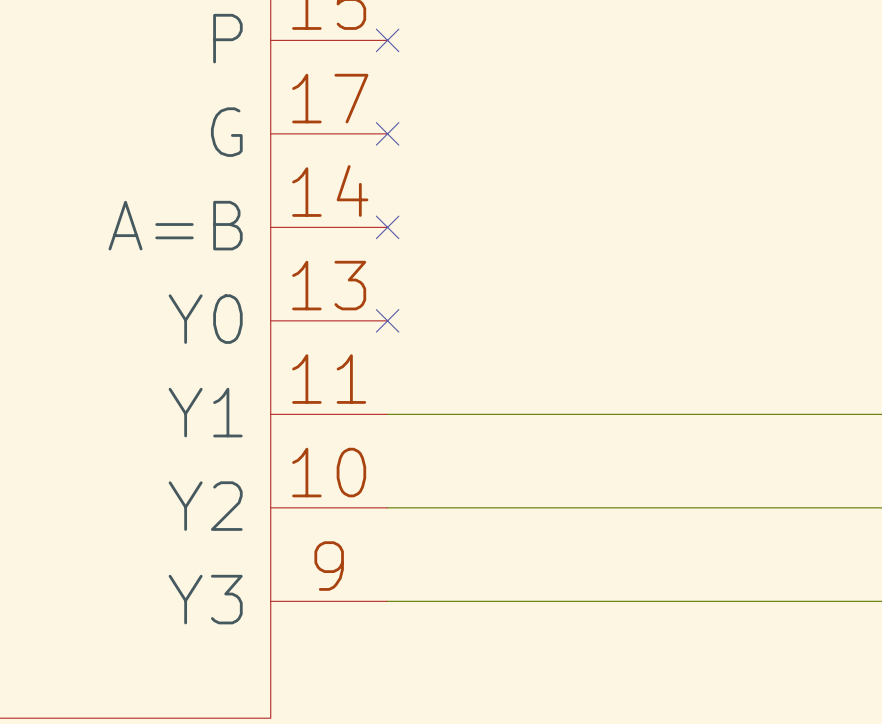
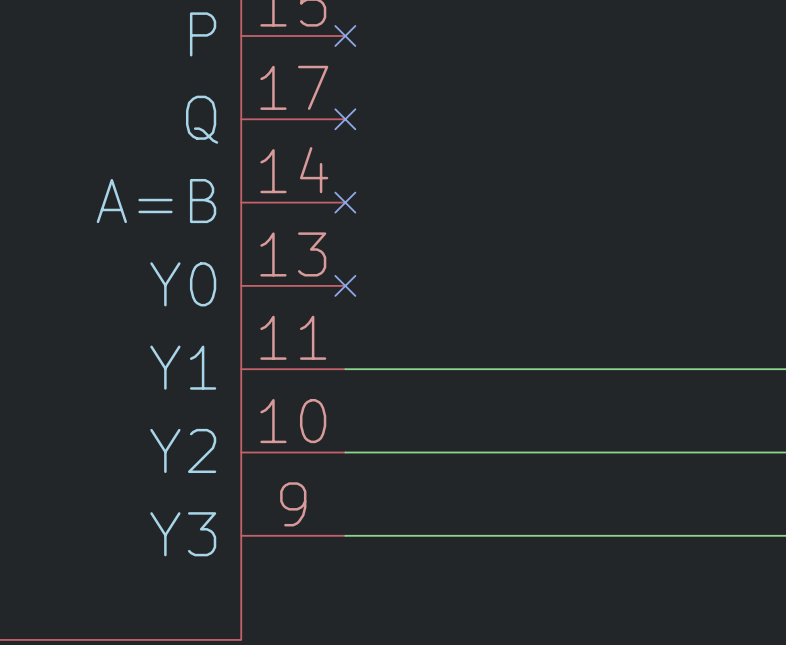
part pin name: G (226, 132) -> Q (202, 119)

